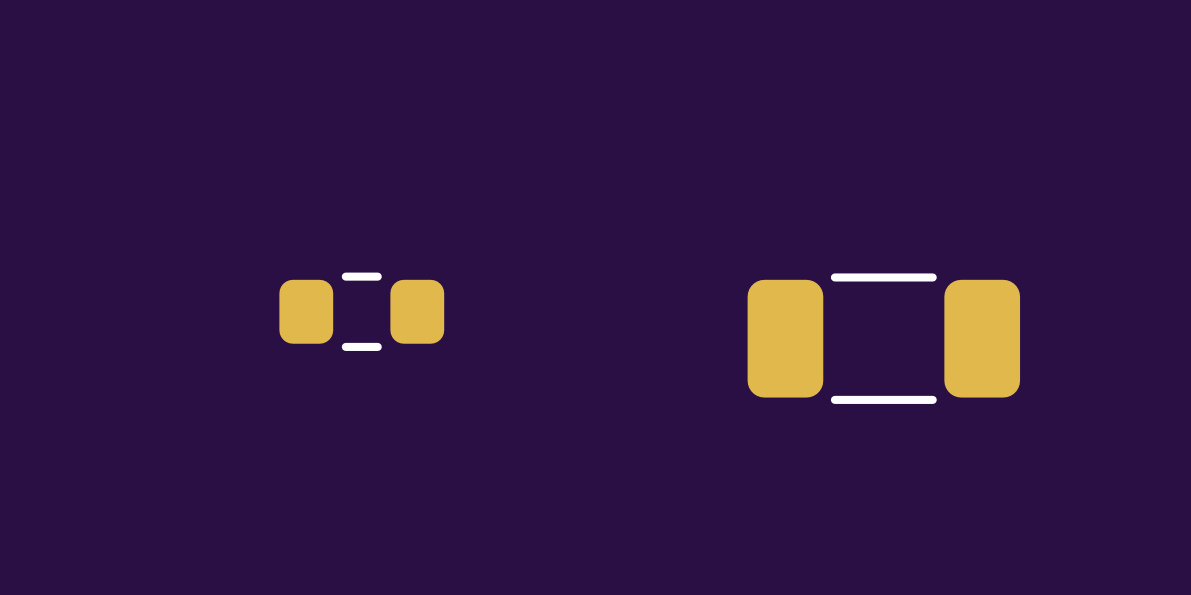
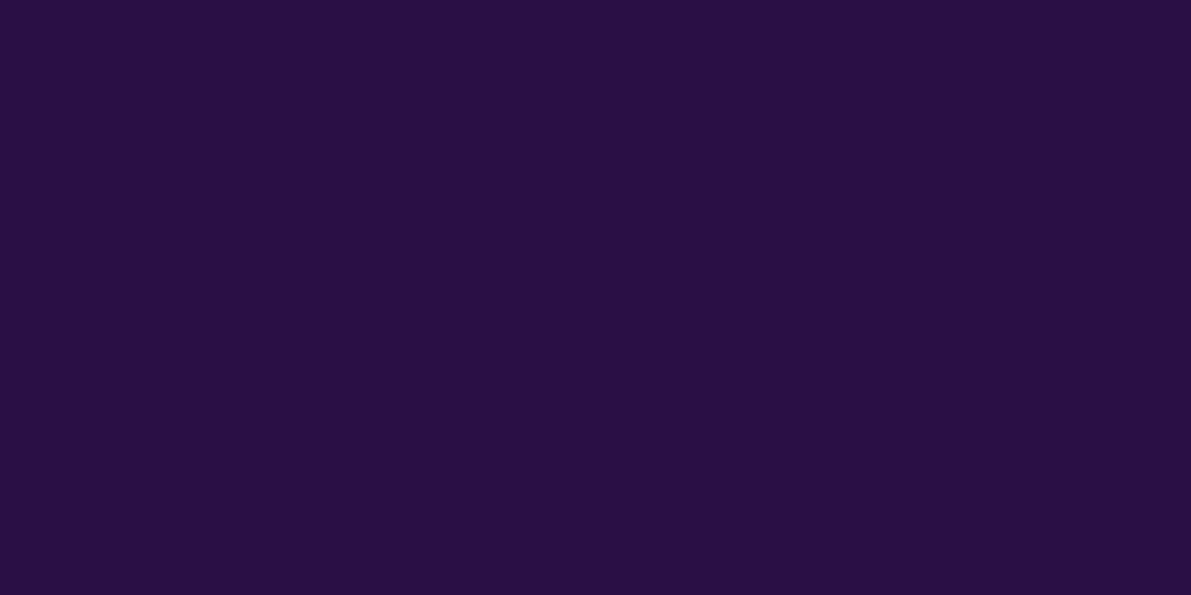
part: (361, 311) -> none
part: (883, 338) -> none

